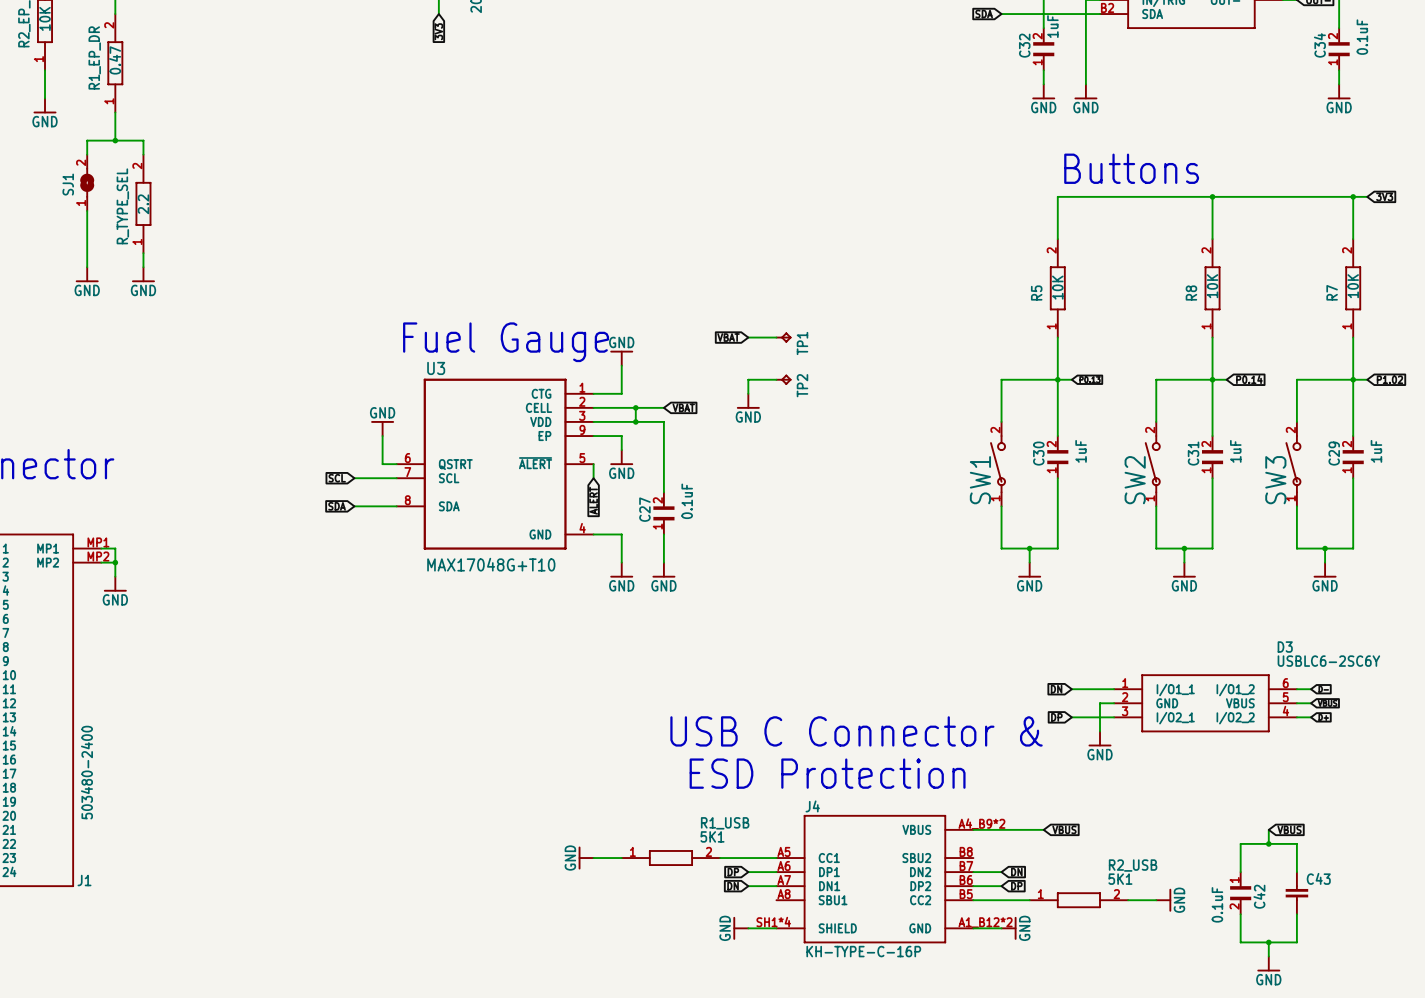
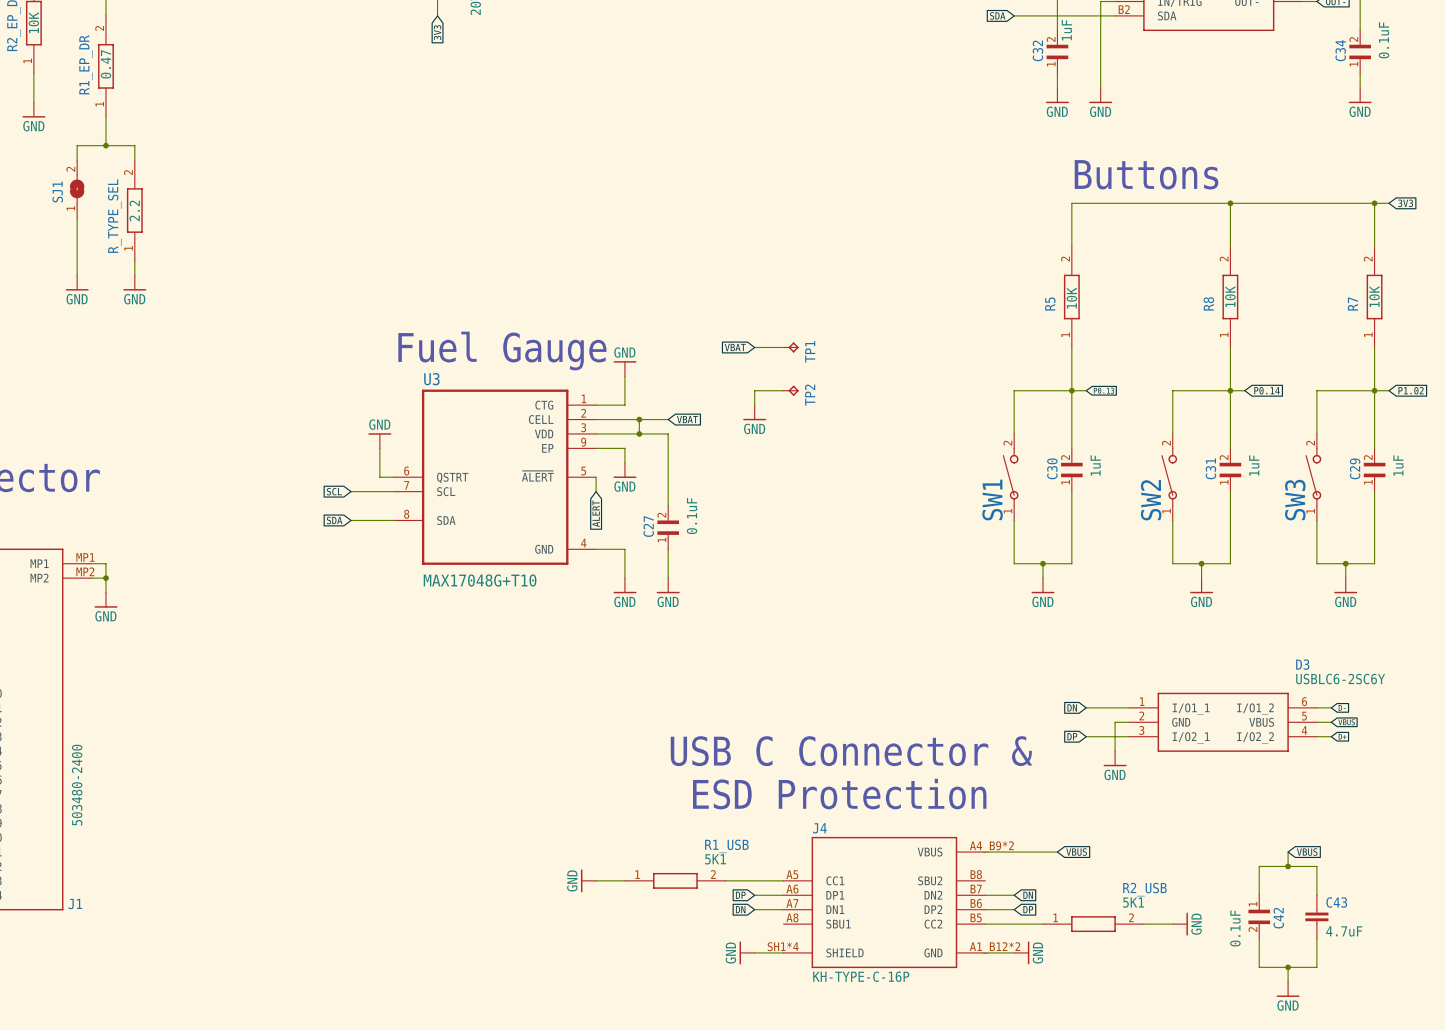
C43 value: none -> 4.7uF (1344, 931)

